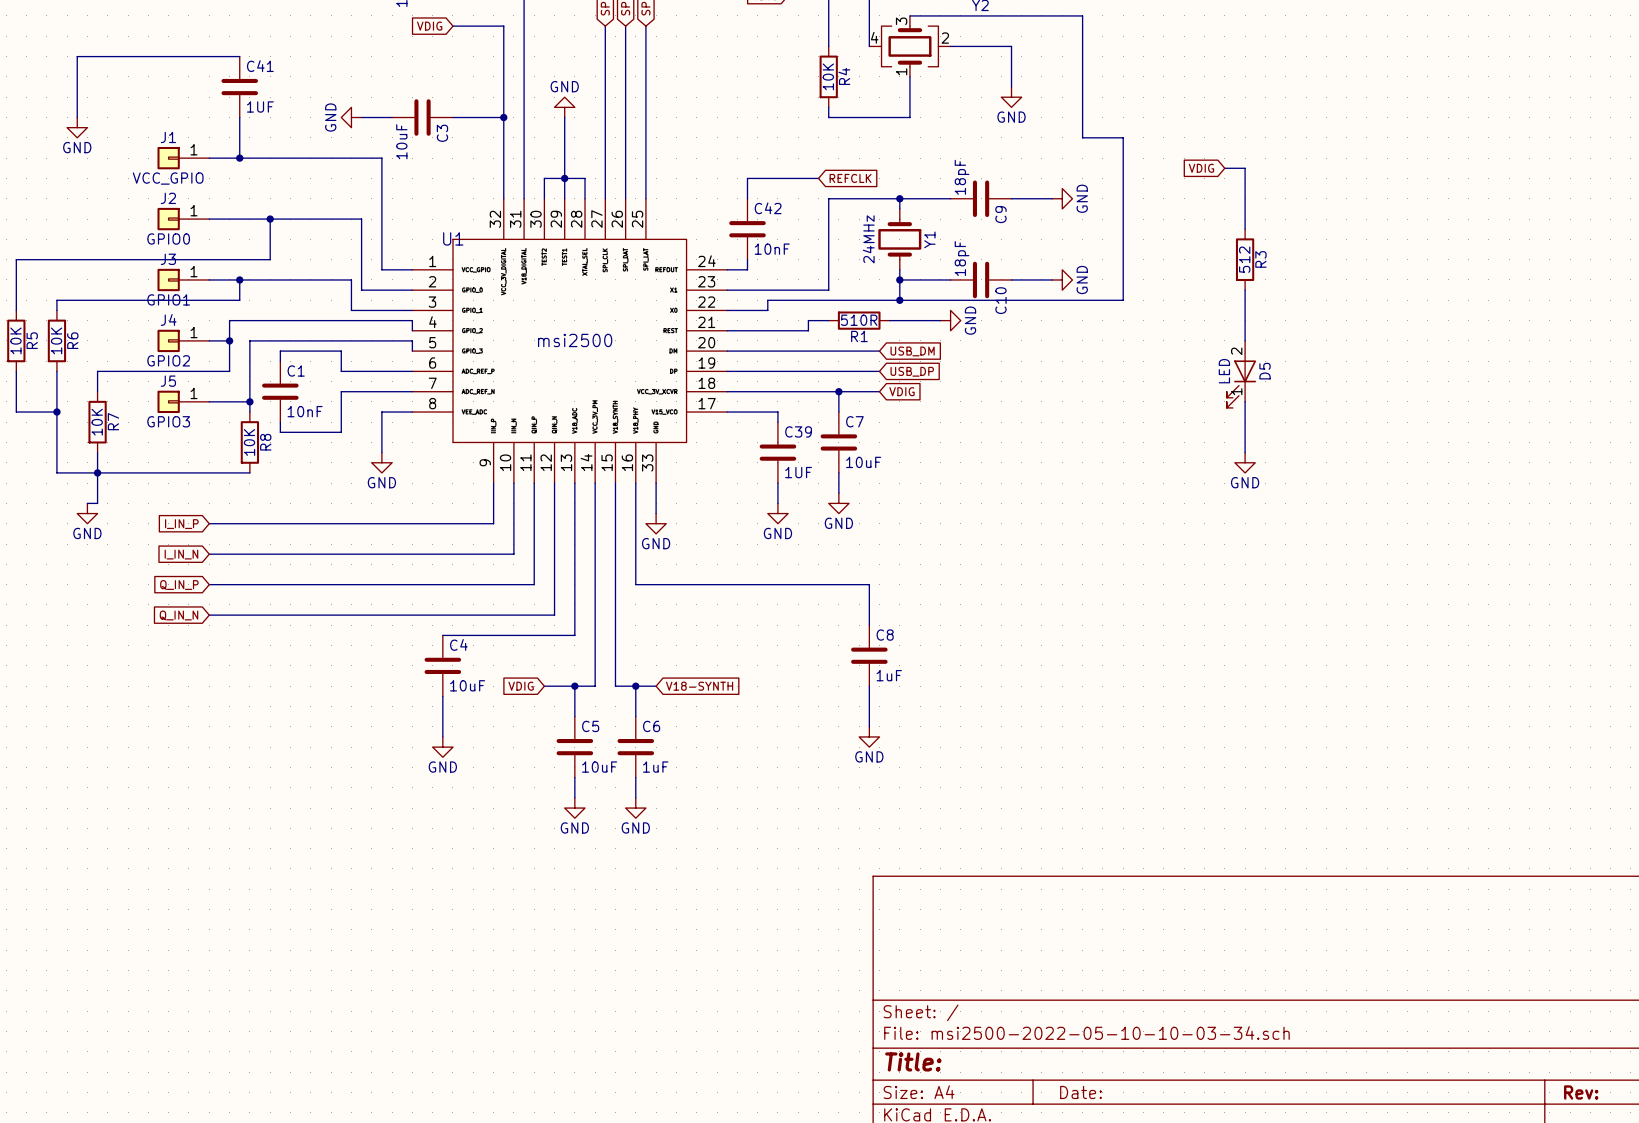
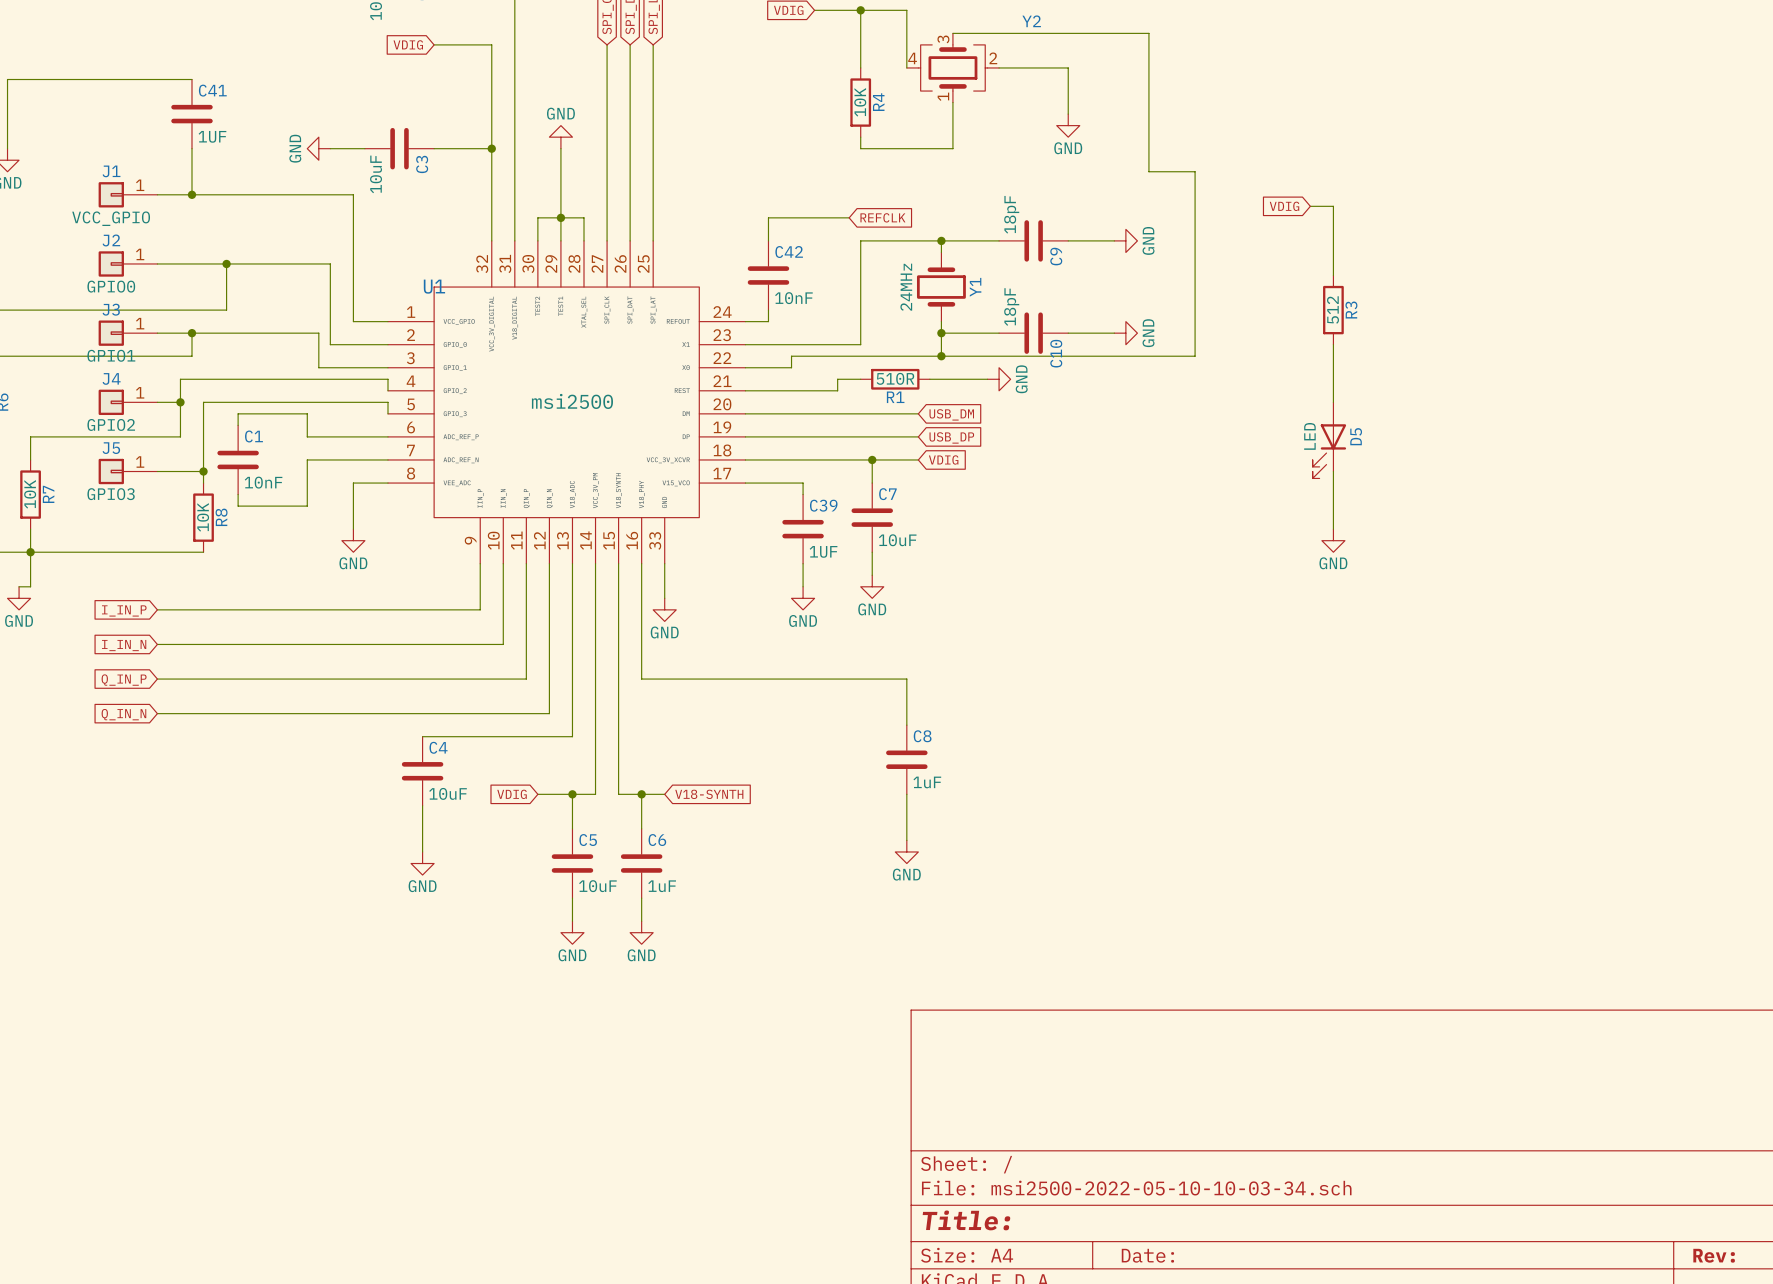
D5 symbol: [1226, 340, 1257, 408] -> [1312, 402, 1347, 479]

